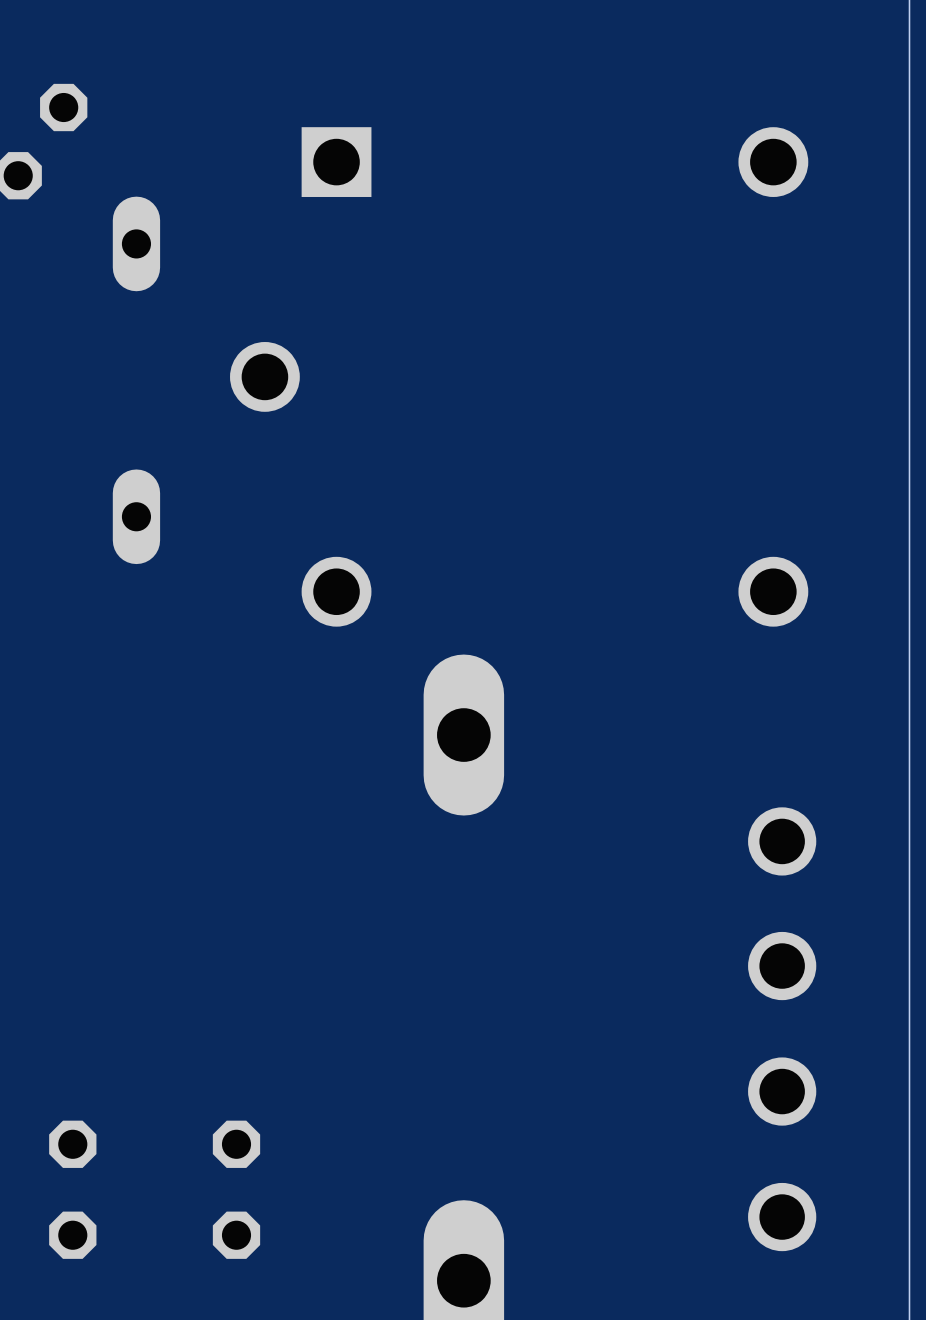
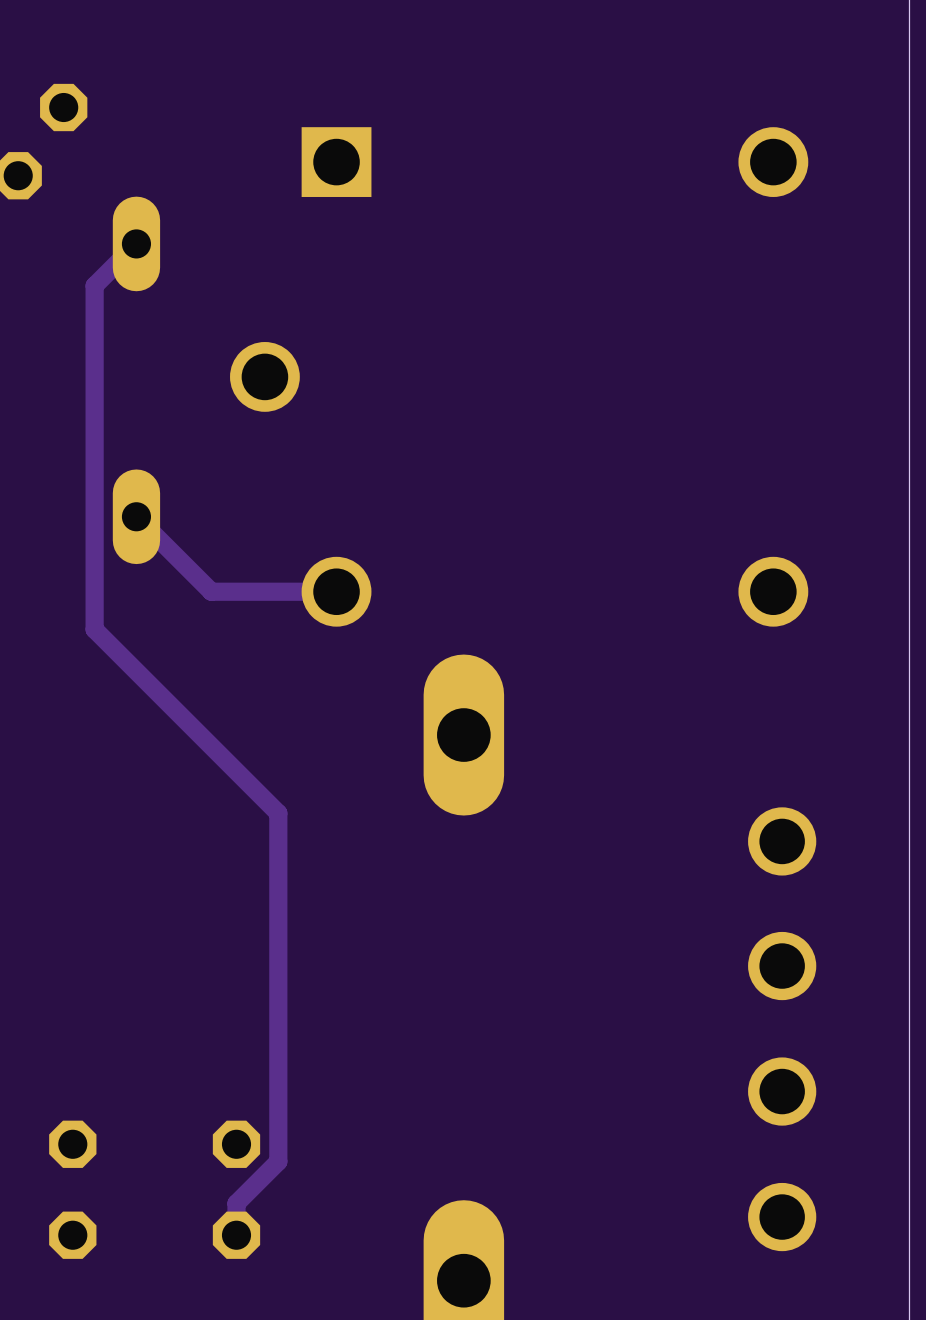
track: none -> (136, 243) (94, 285) (94, 629) (278, 813) (278, 1161) (236, 1203) (236, 1235)
track: none -> (136, 516) (211, 591) (336, 591)

